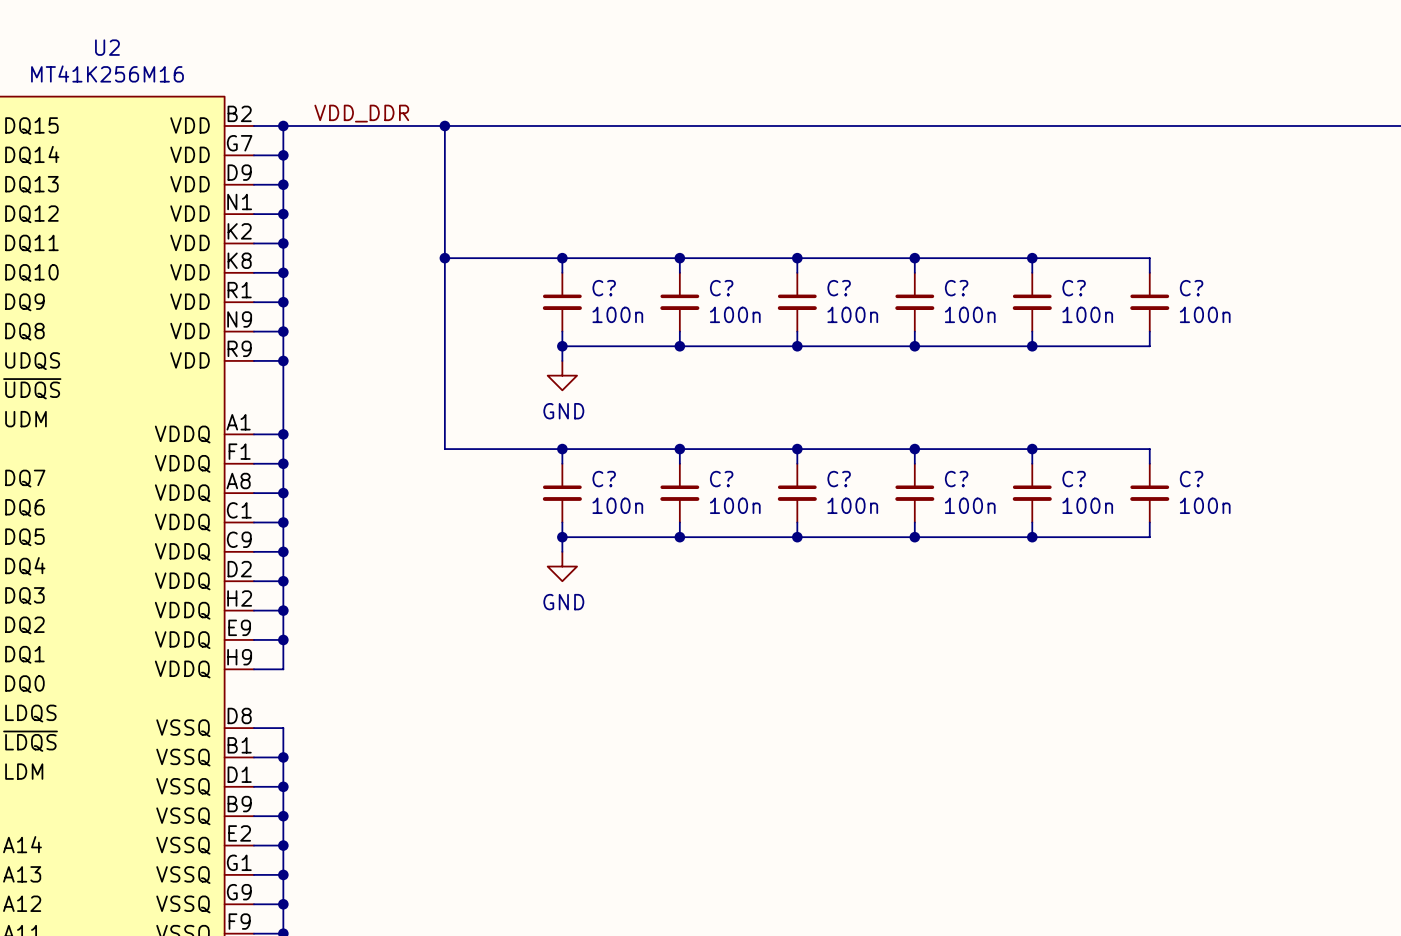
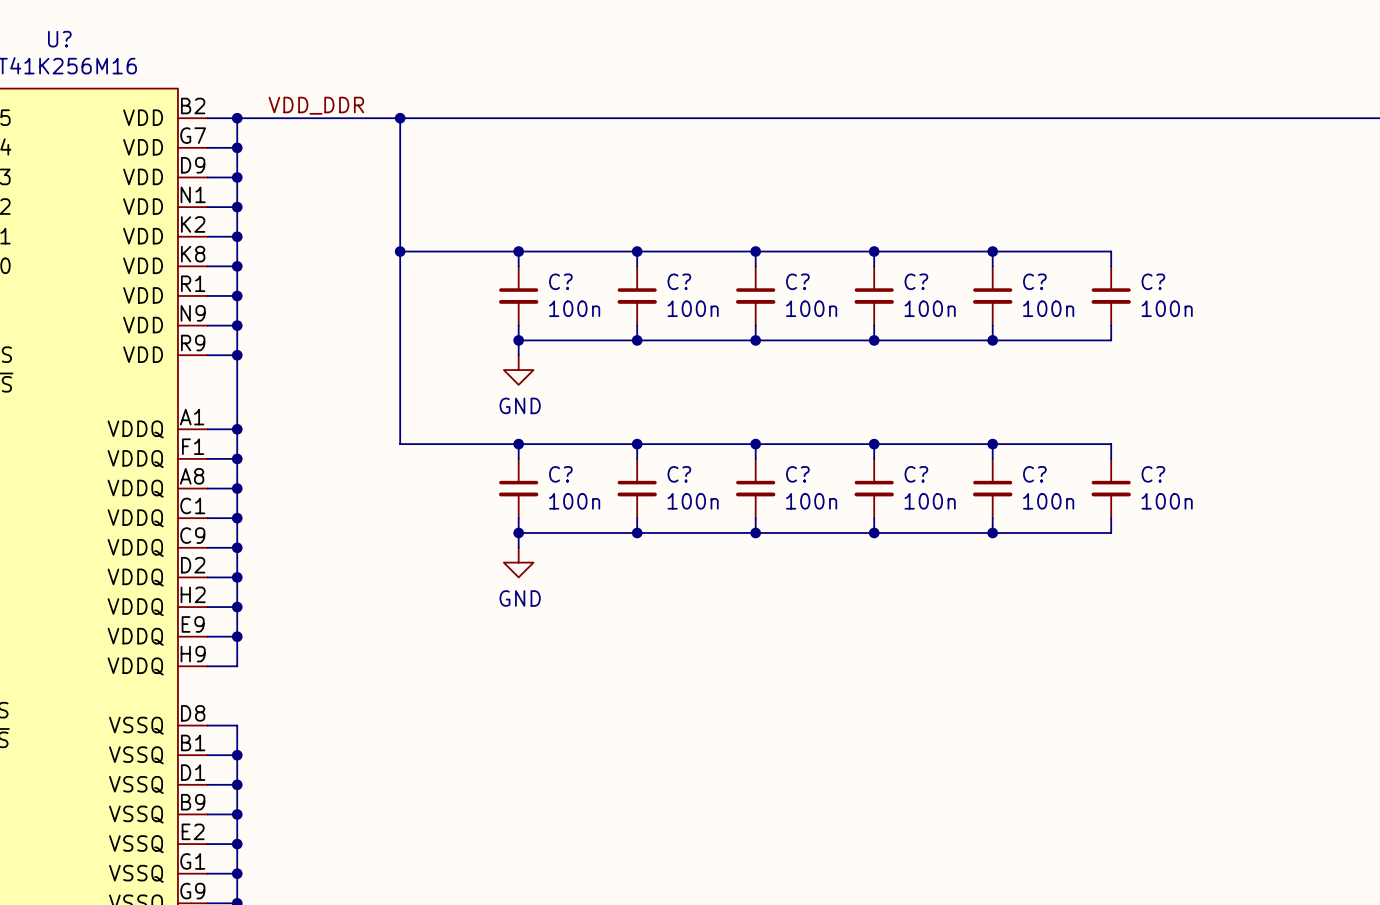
U2 name: U2 (107, 47) -> U? (59, 39)

